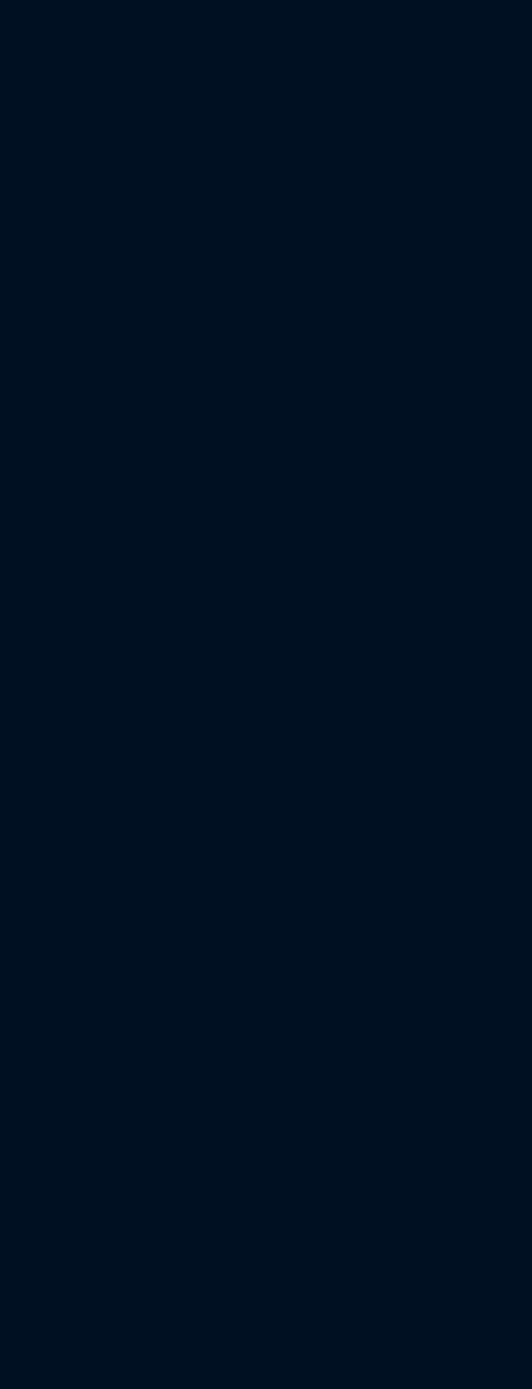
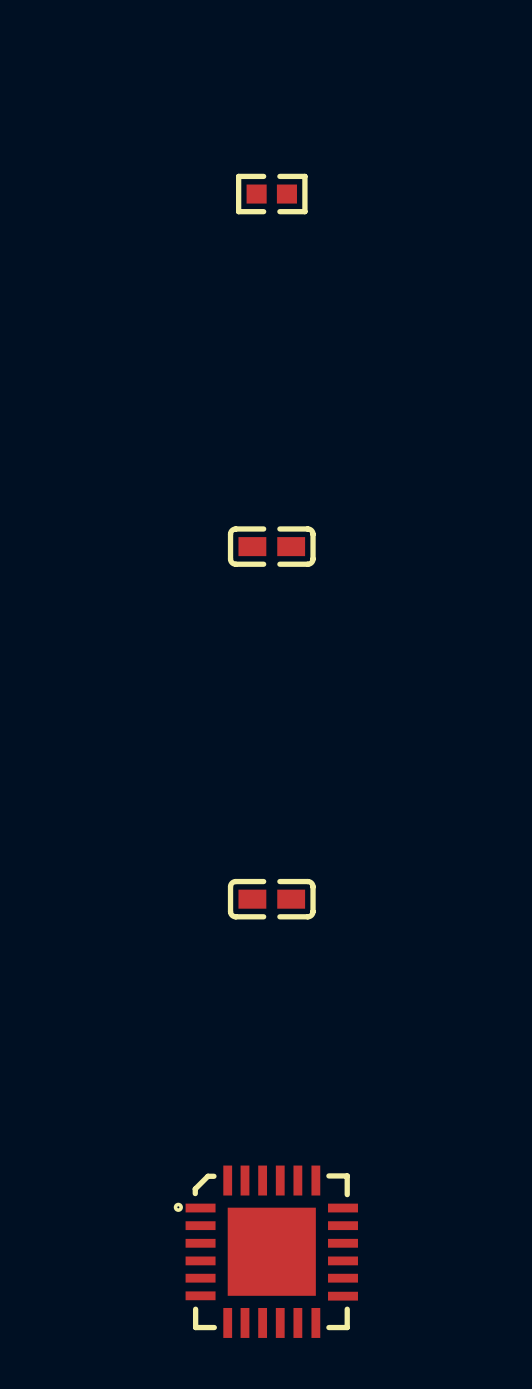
part: none -> (271, 194)
part: none -> (271, 546)
part: none -> (271, 899)
part: none -> (265, 1251)

